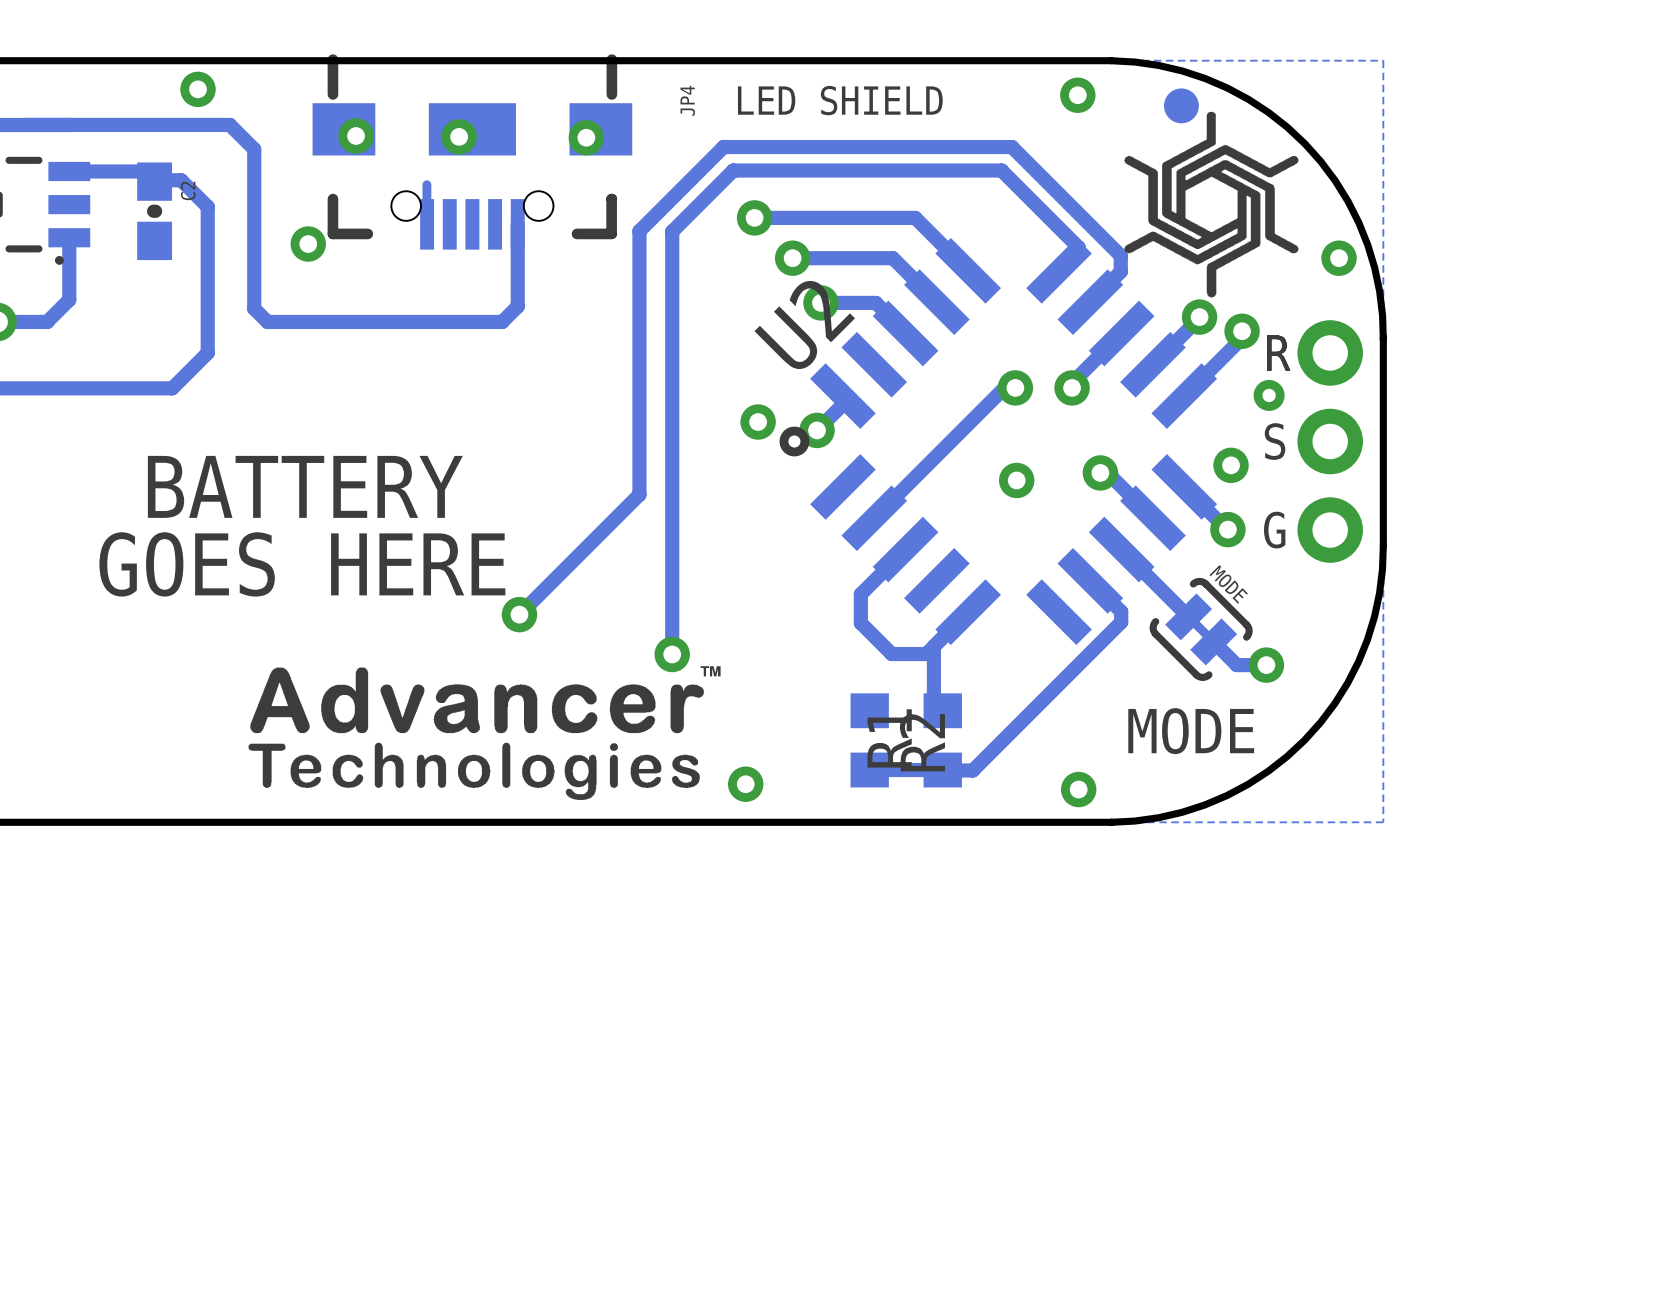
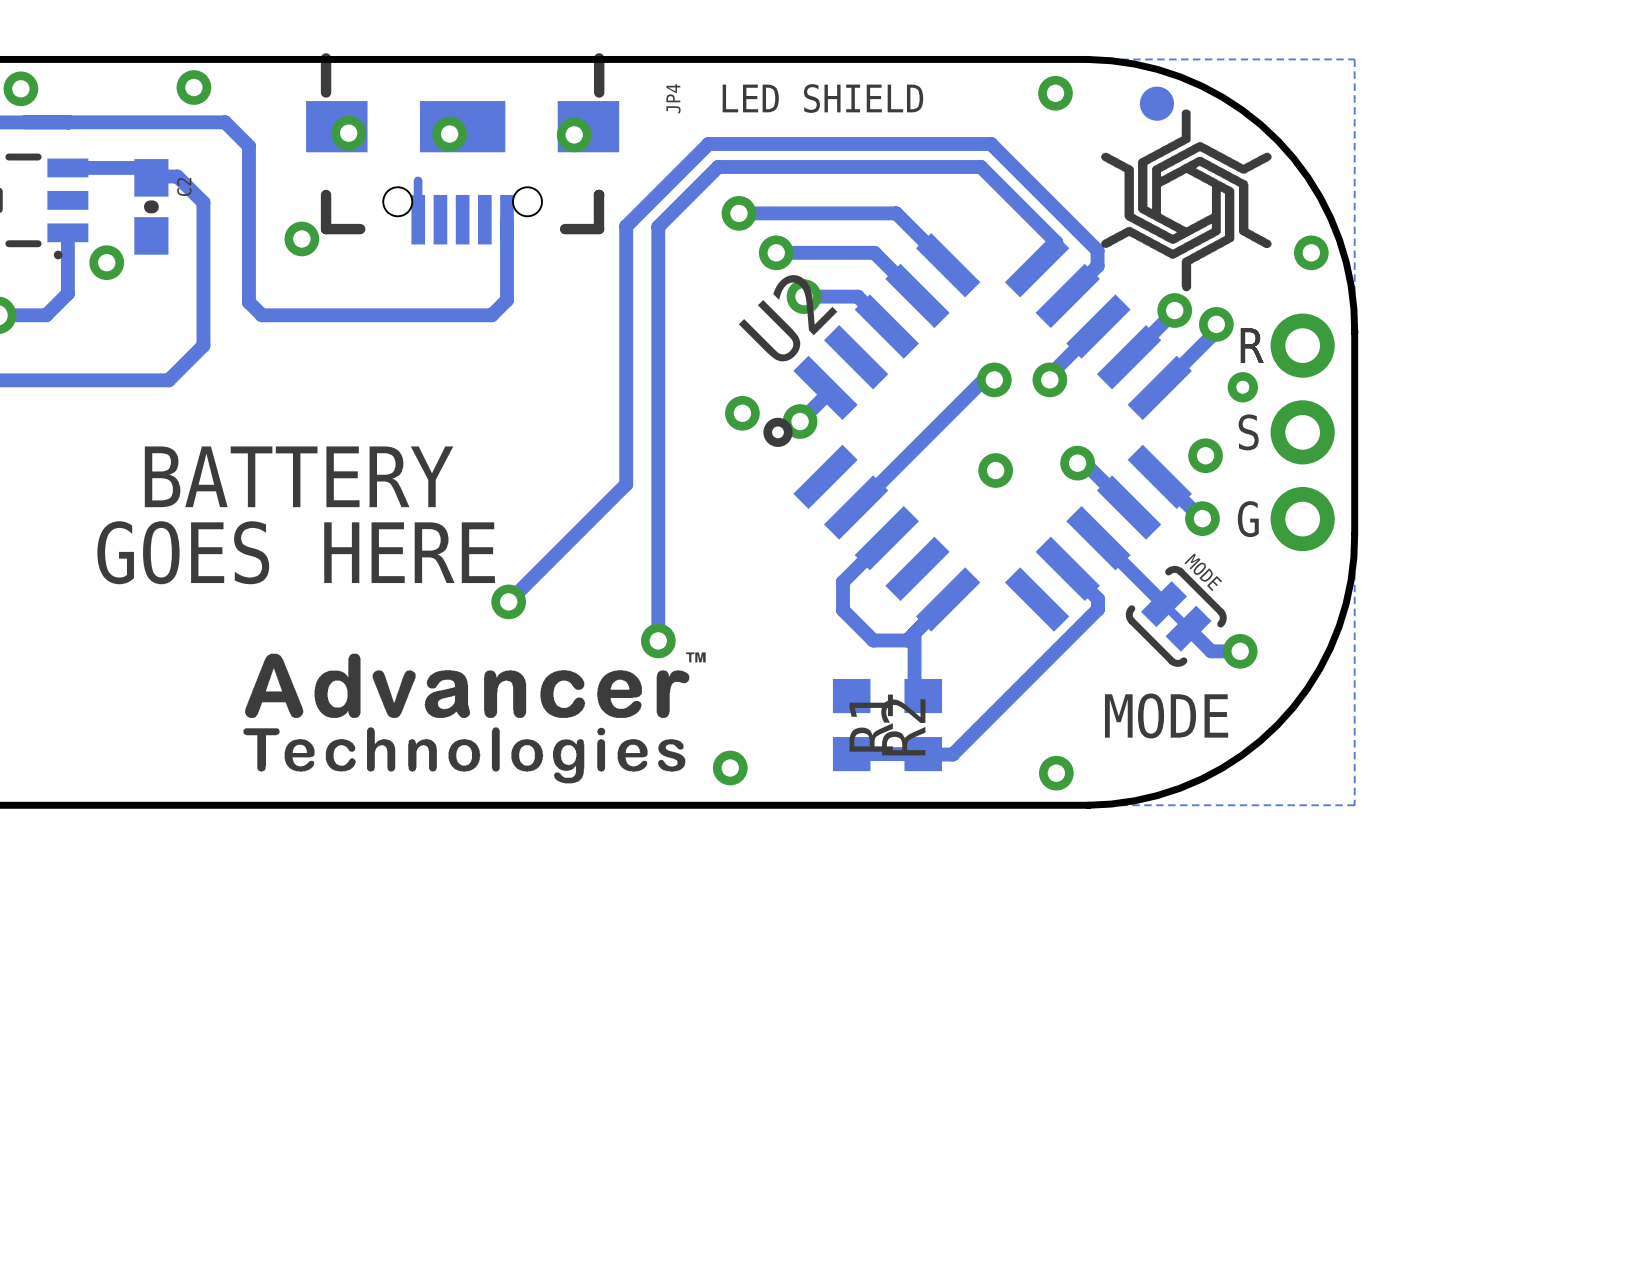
via: none -> (20, 88)
via: none -> (106, 262)

